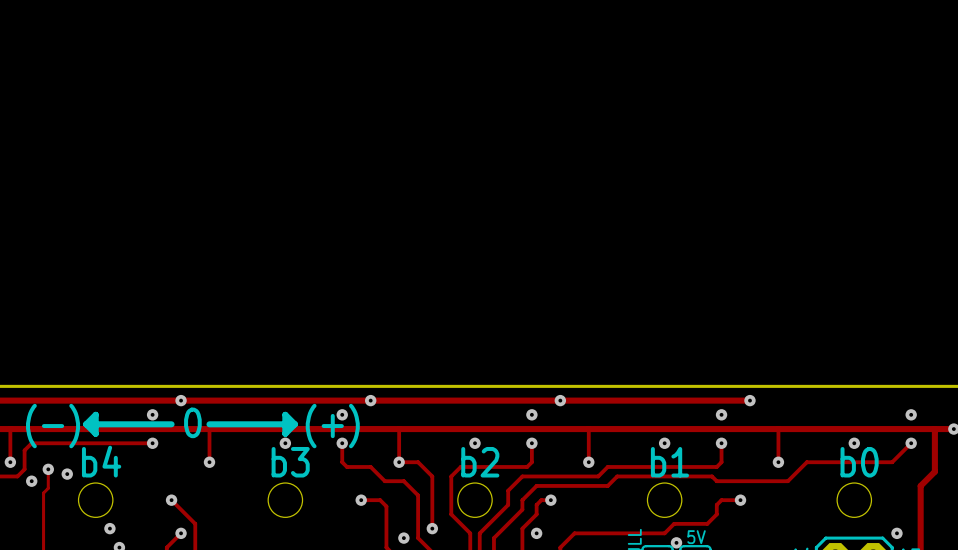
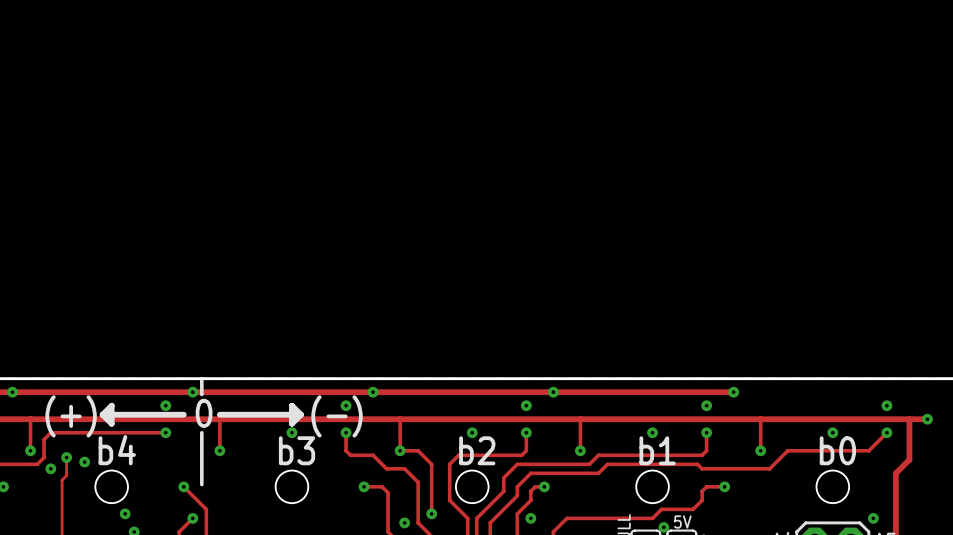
line: none -> (201, 378) (201, 394)
text: (-) (53, 426) -> (+) (71, 416)
text: (+) (332, 426) -> (-) (337, 416)
line: none -> (201, 432) (201, 484)

